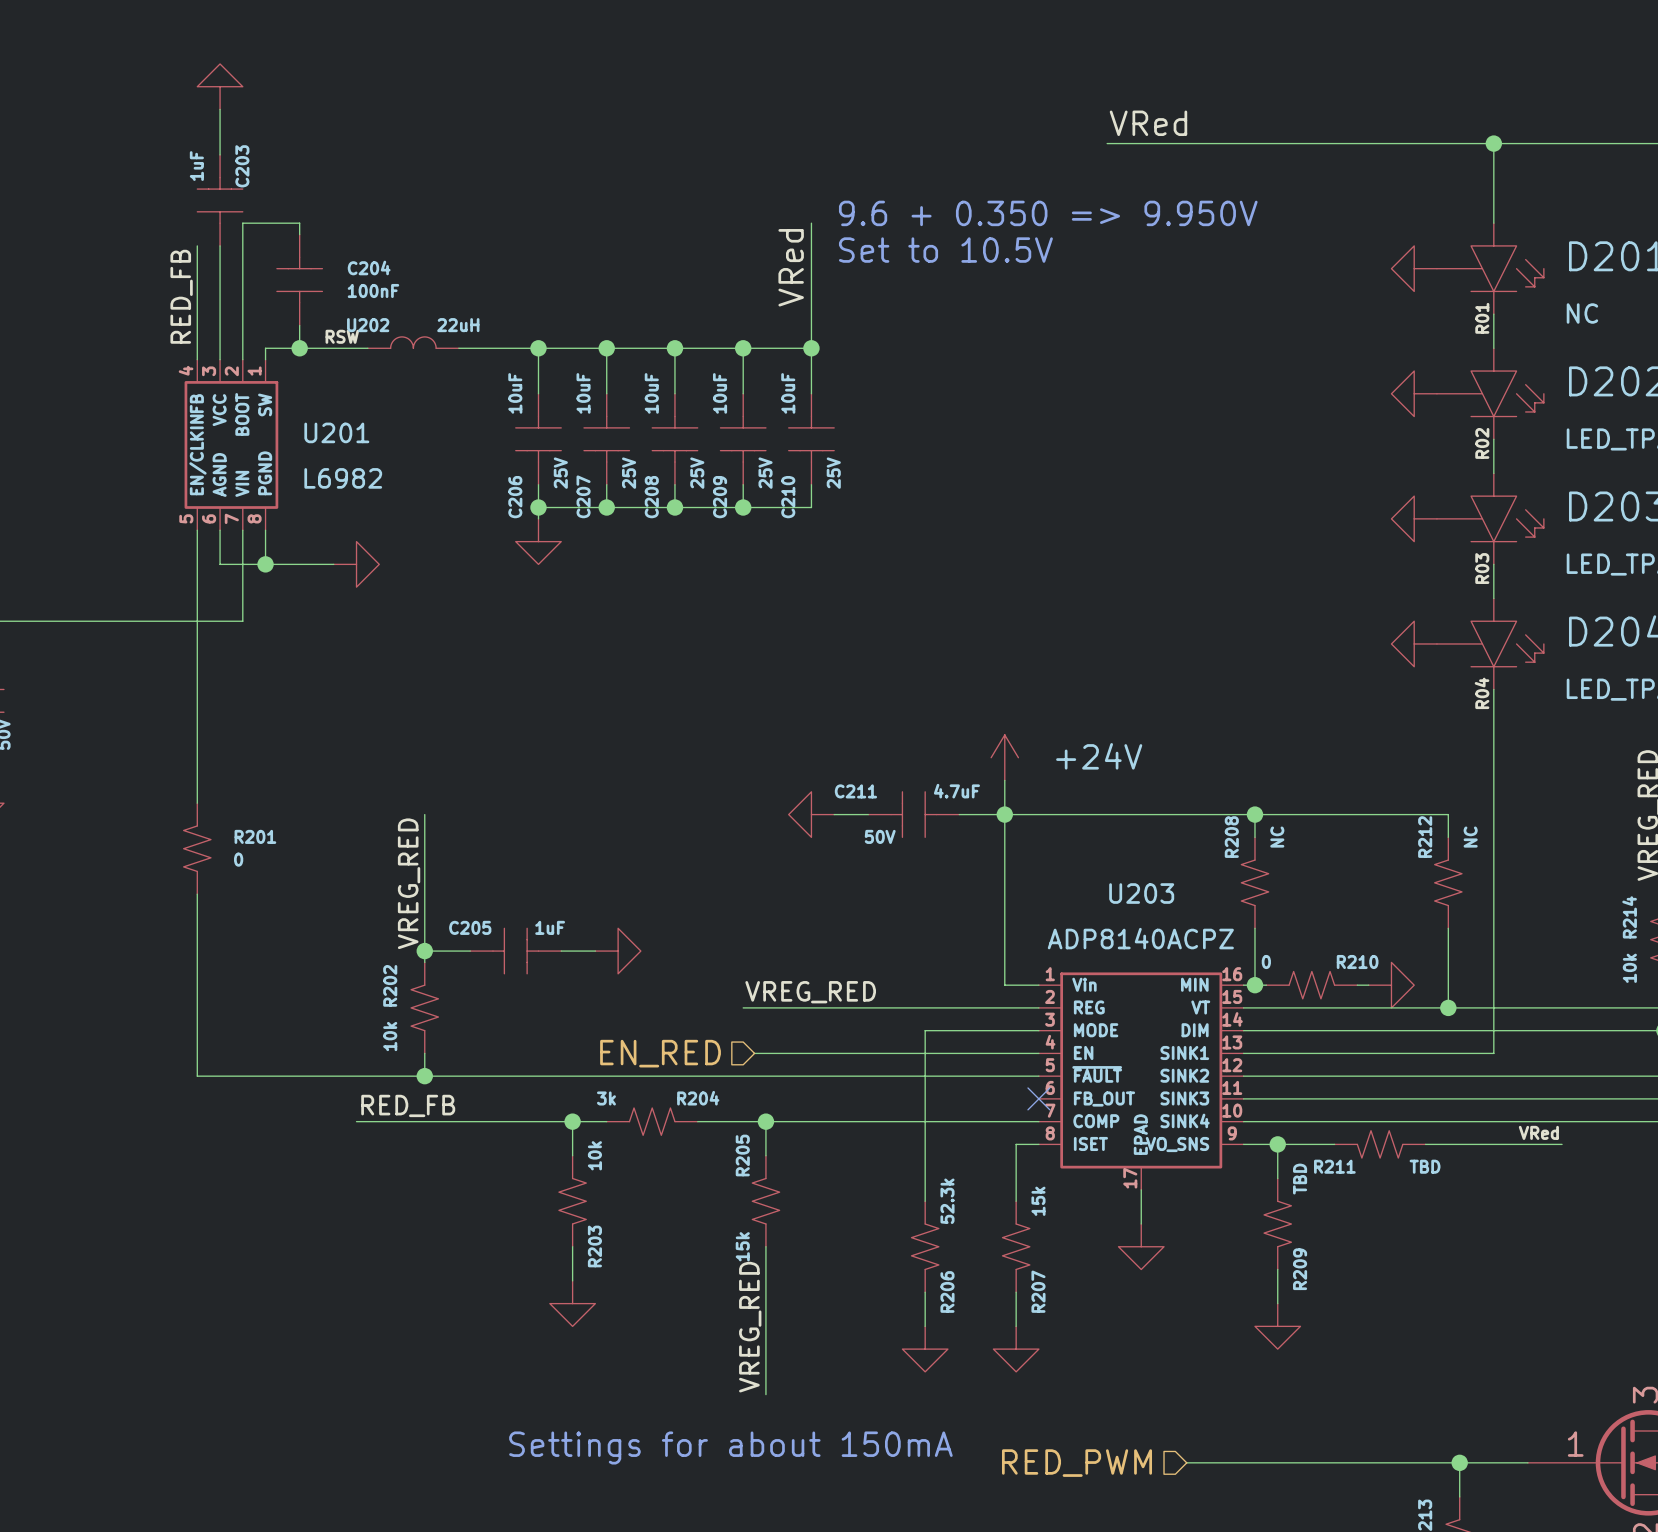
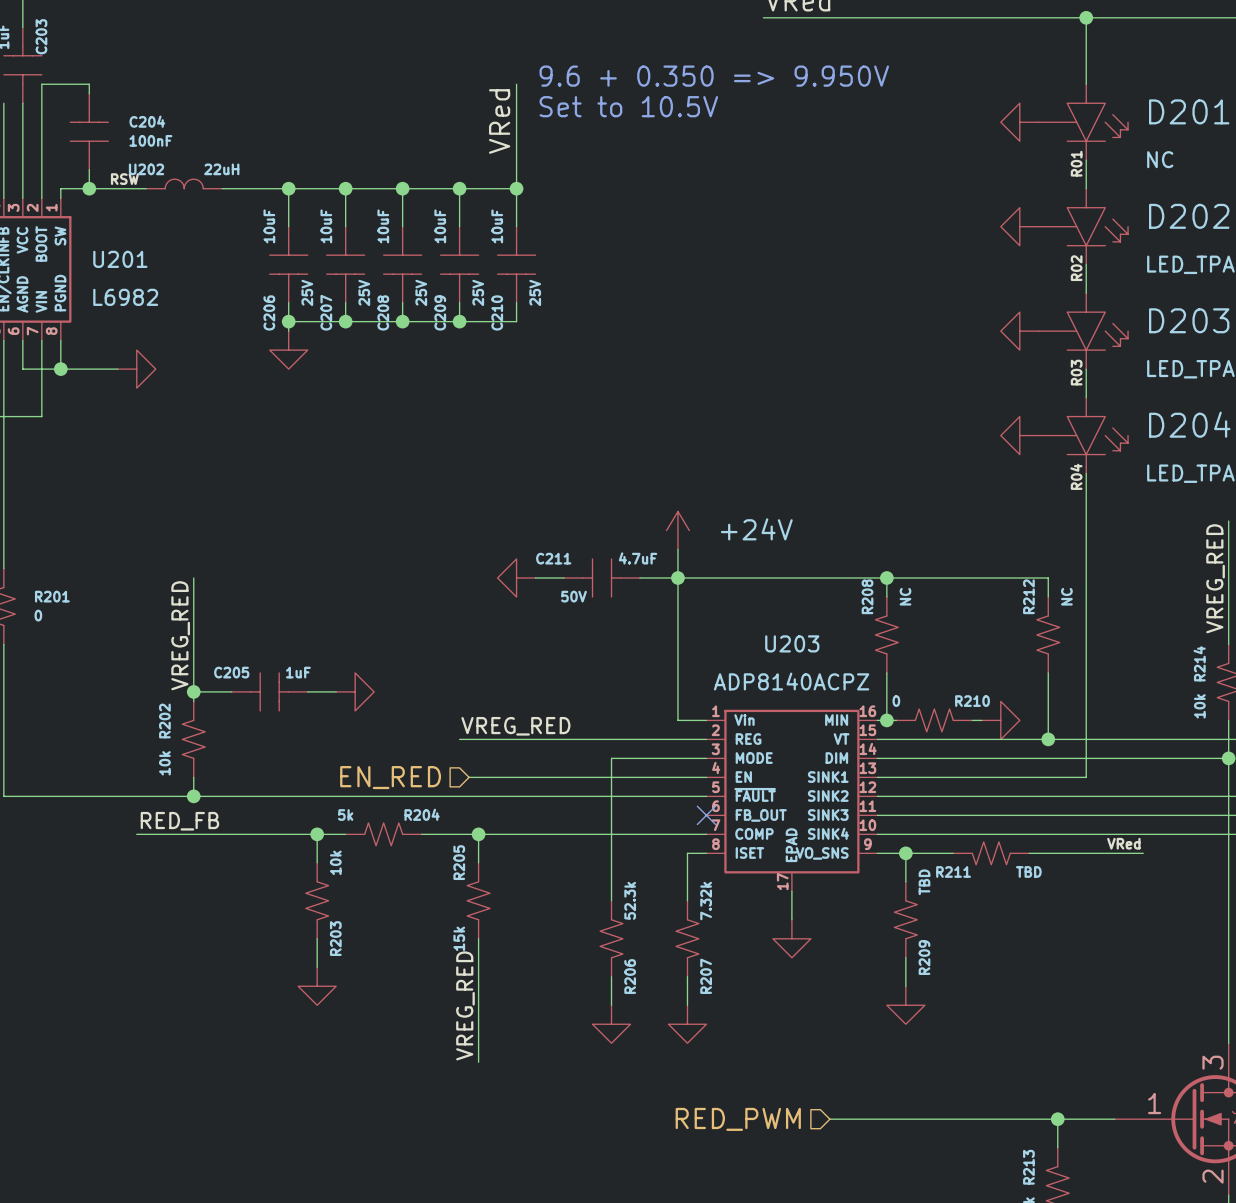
R204 value: 3k (606, 1098) -> 5k (345, 815)
R207 value: 15k (1038, 1201) -> 7.32k (706, 901)
text: Settings for about 150mA (730, 1447) -> none

